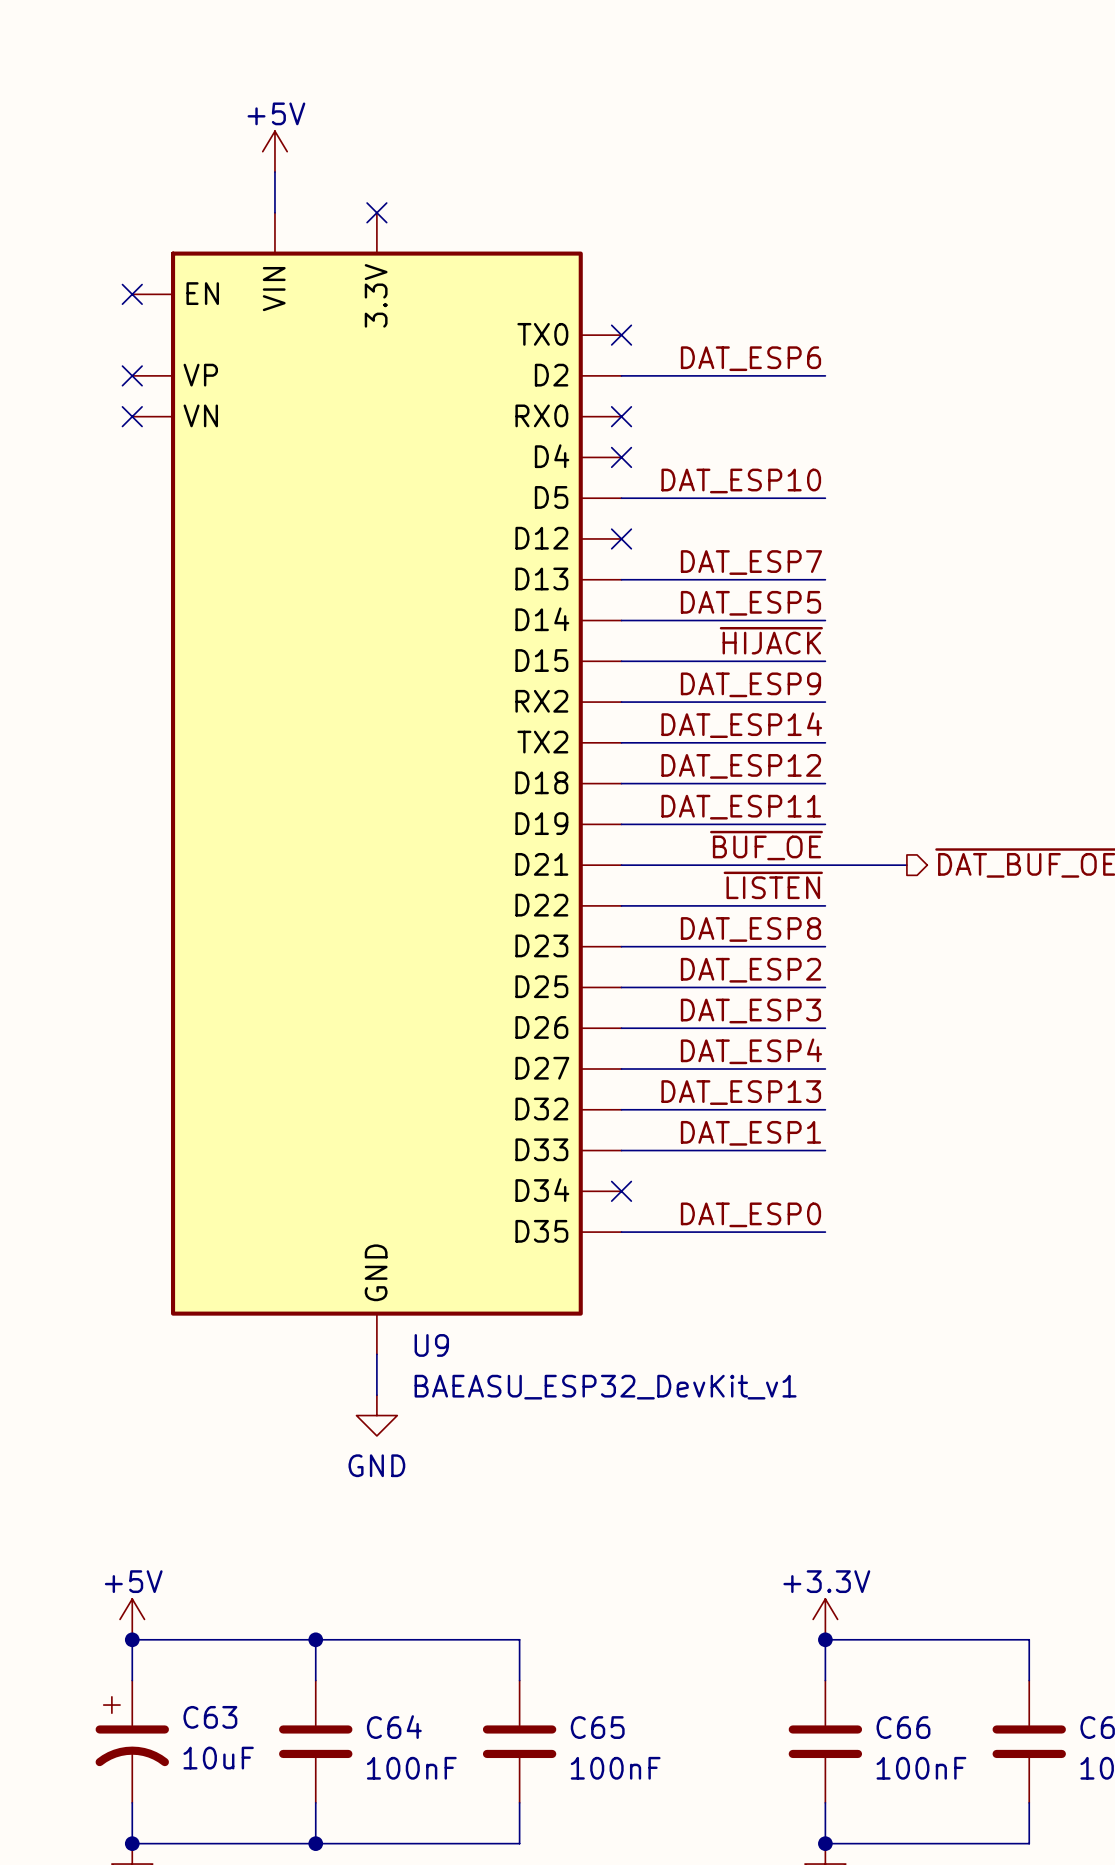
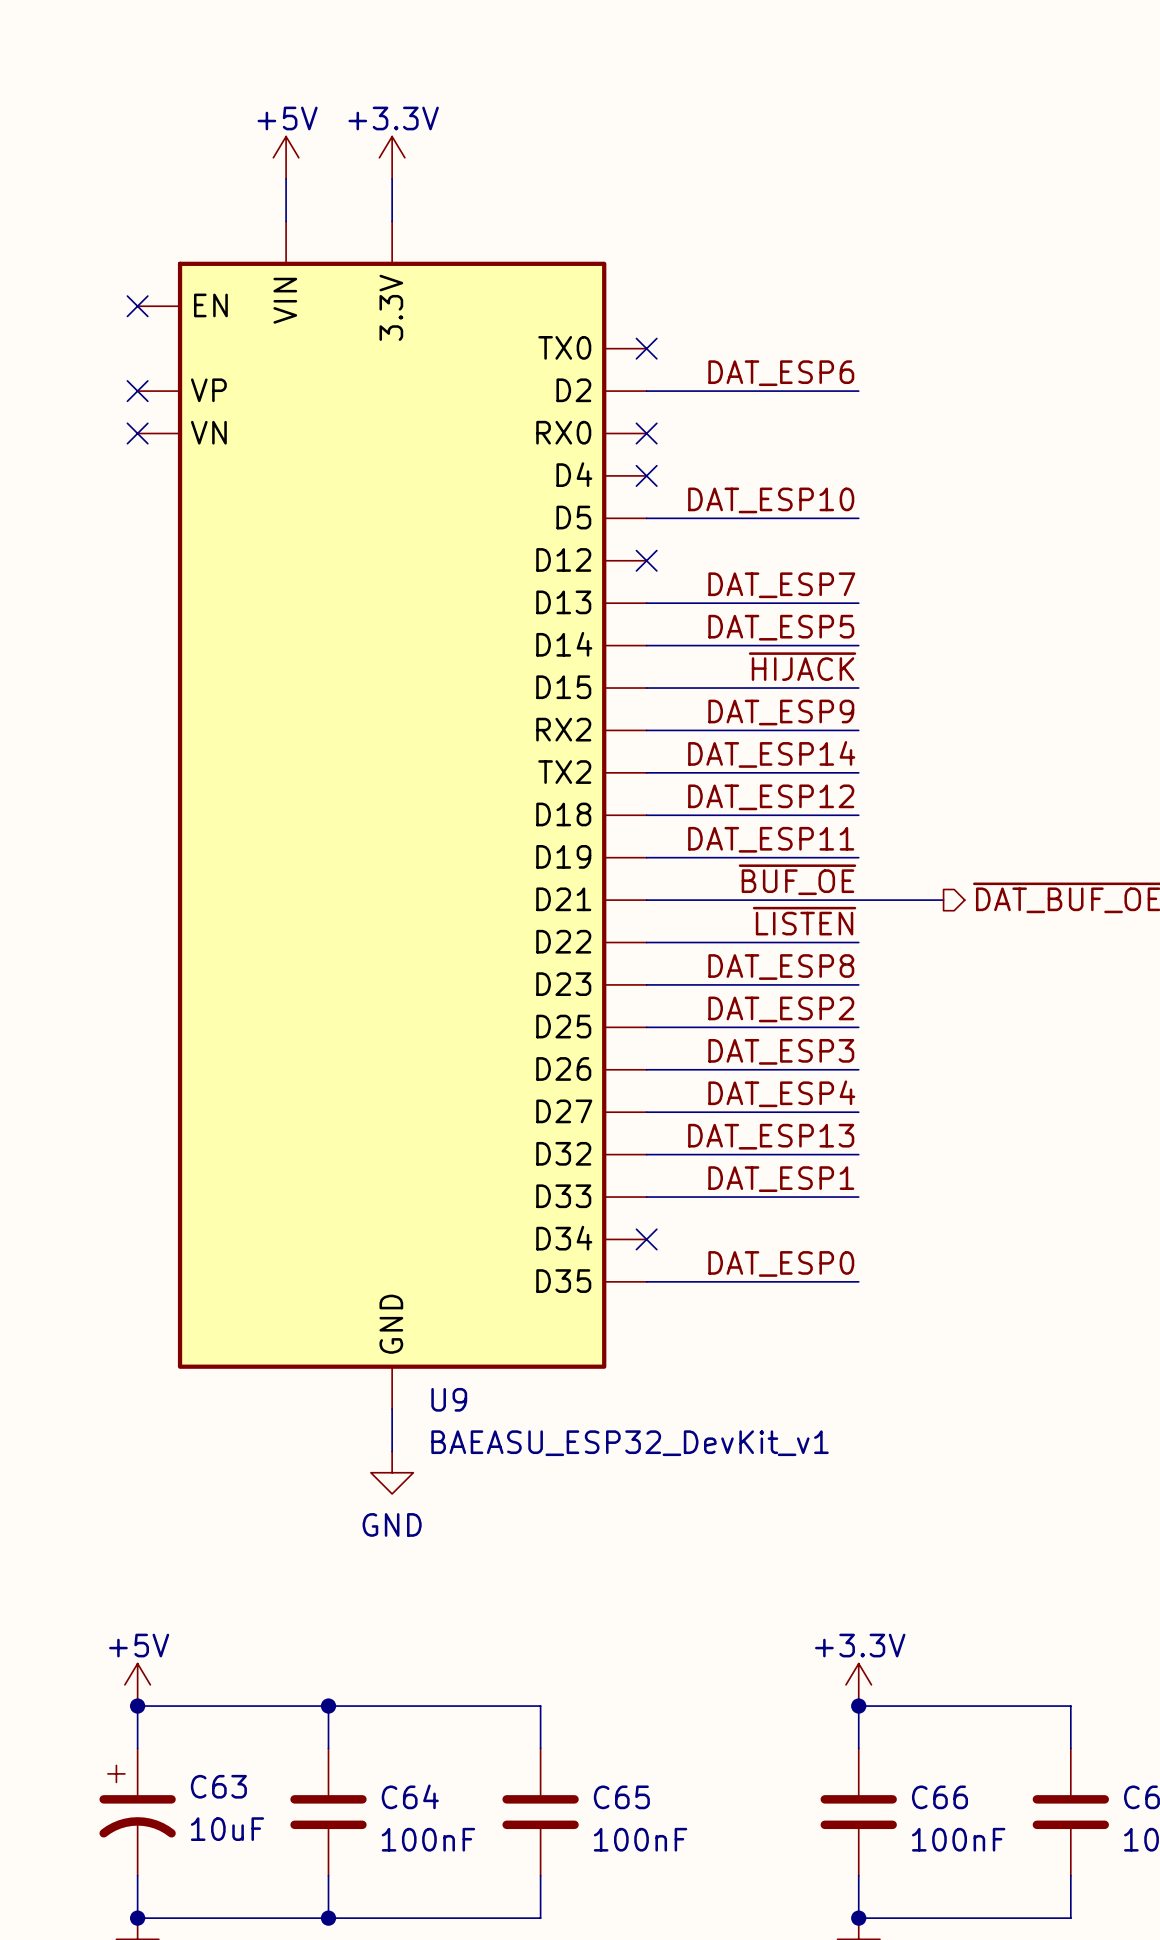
power symbol: none -> +3.3V (392, 157)
wire: none -> (392, 178) (392, 221)
no-connect mark: (376, 212) -> none

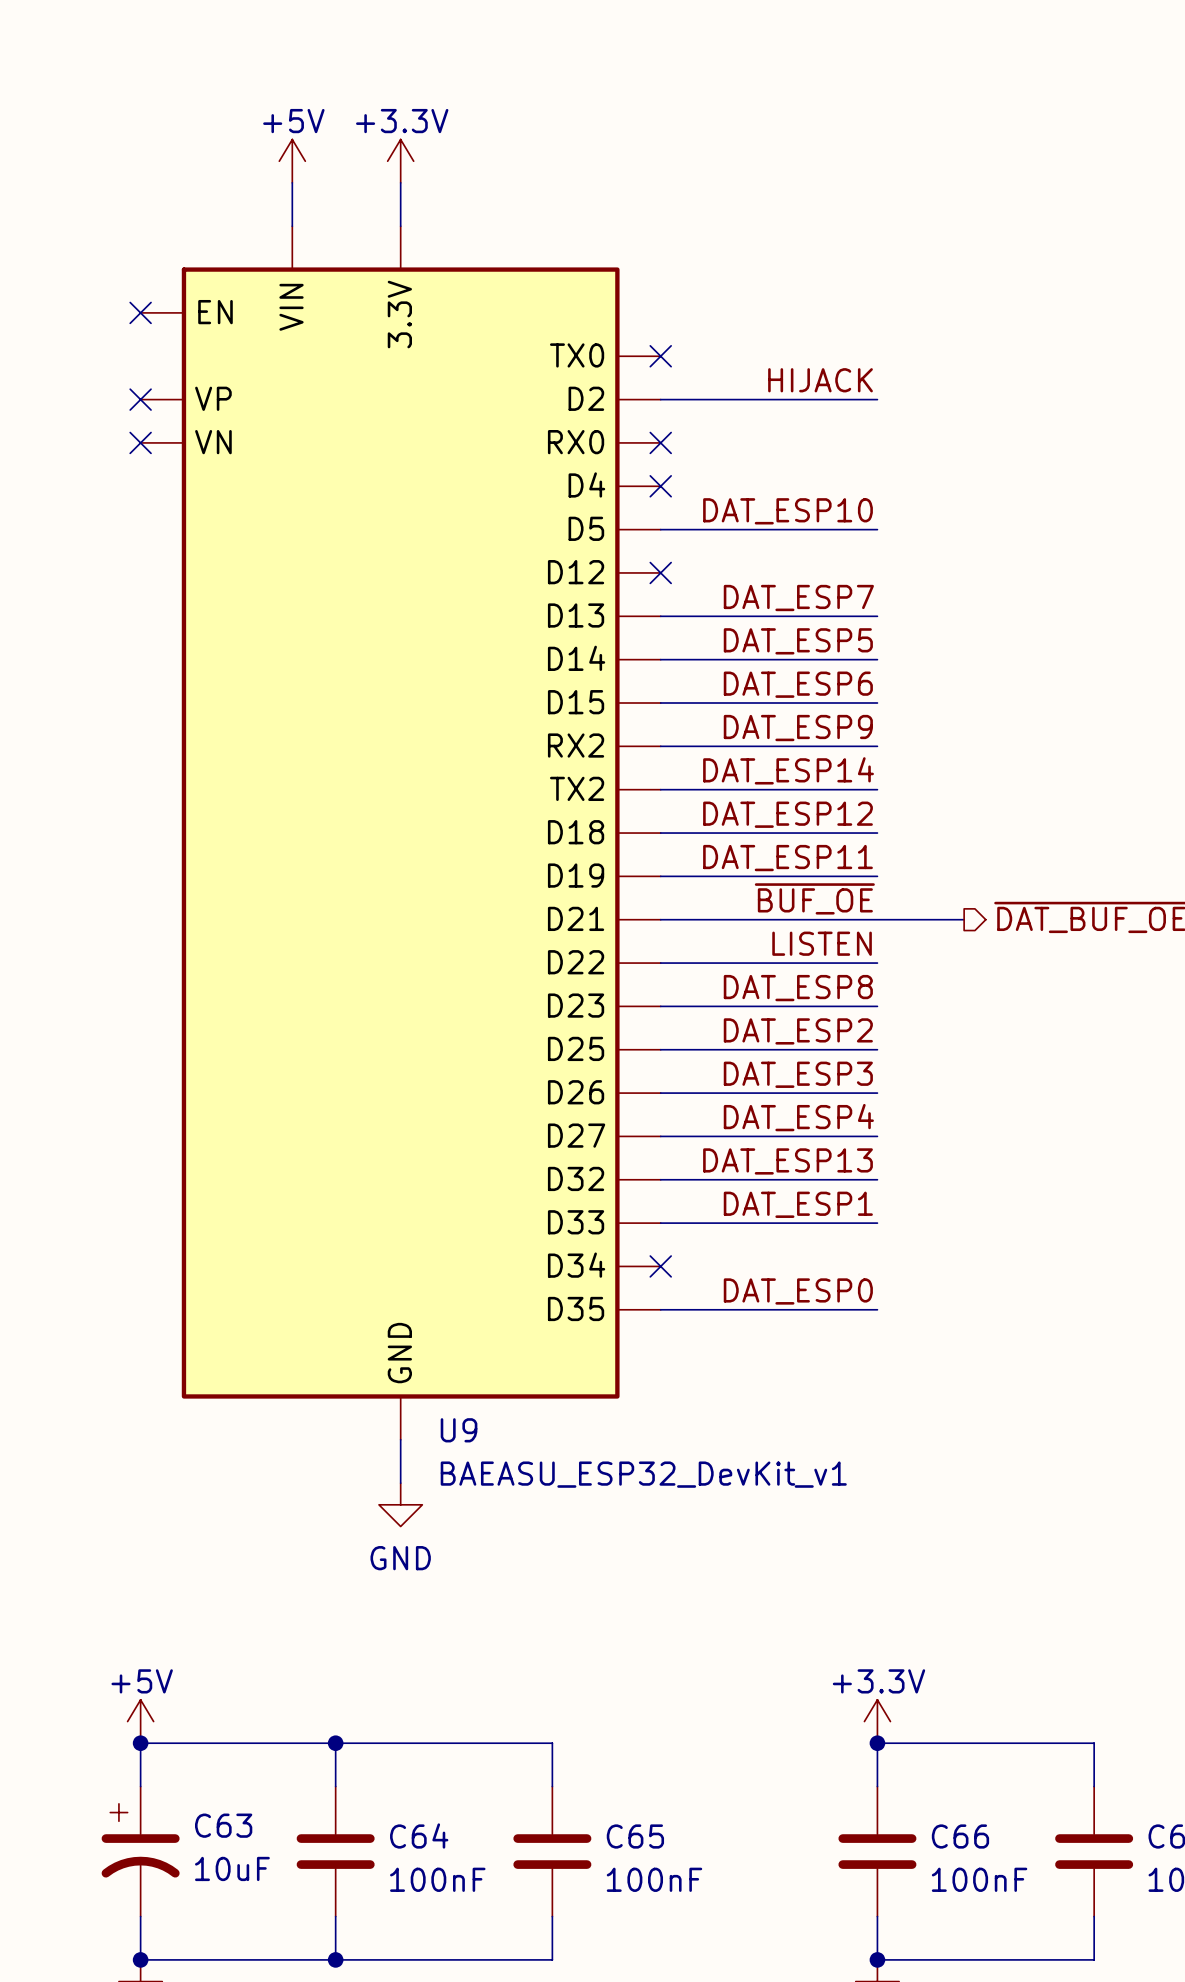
label: DAT_ESP6 (781, 373) -> HIJACK (820, 380)
label: ~{HIJACK} (802, 666) -> DAT_ESP6 (798, 684)
label: ~{LISTEN} (804, 921) -> LISTEN (822, 943)

